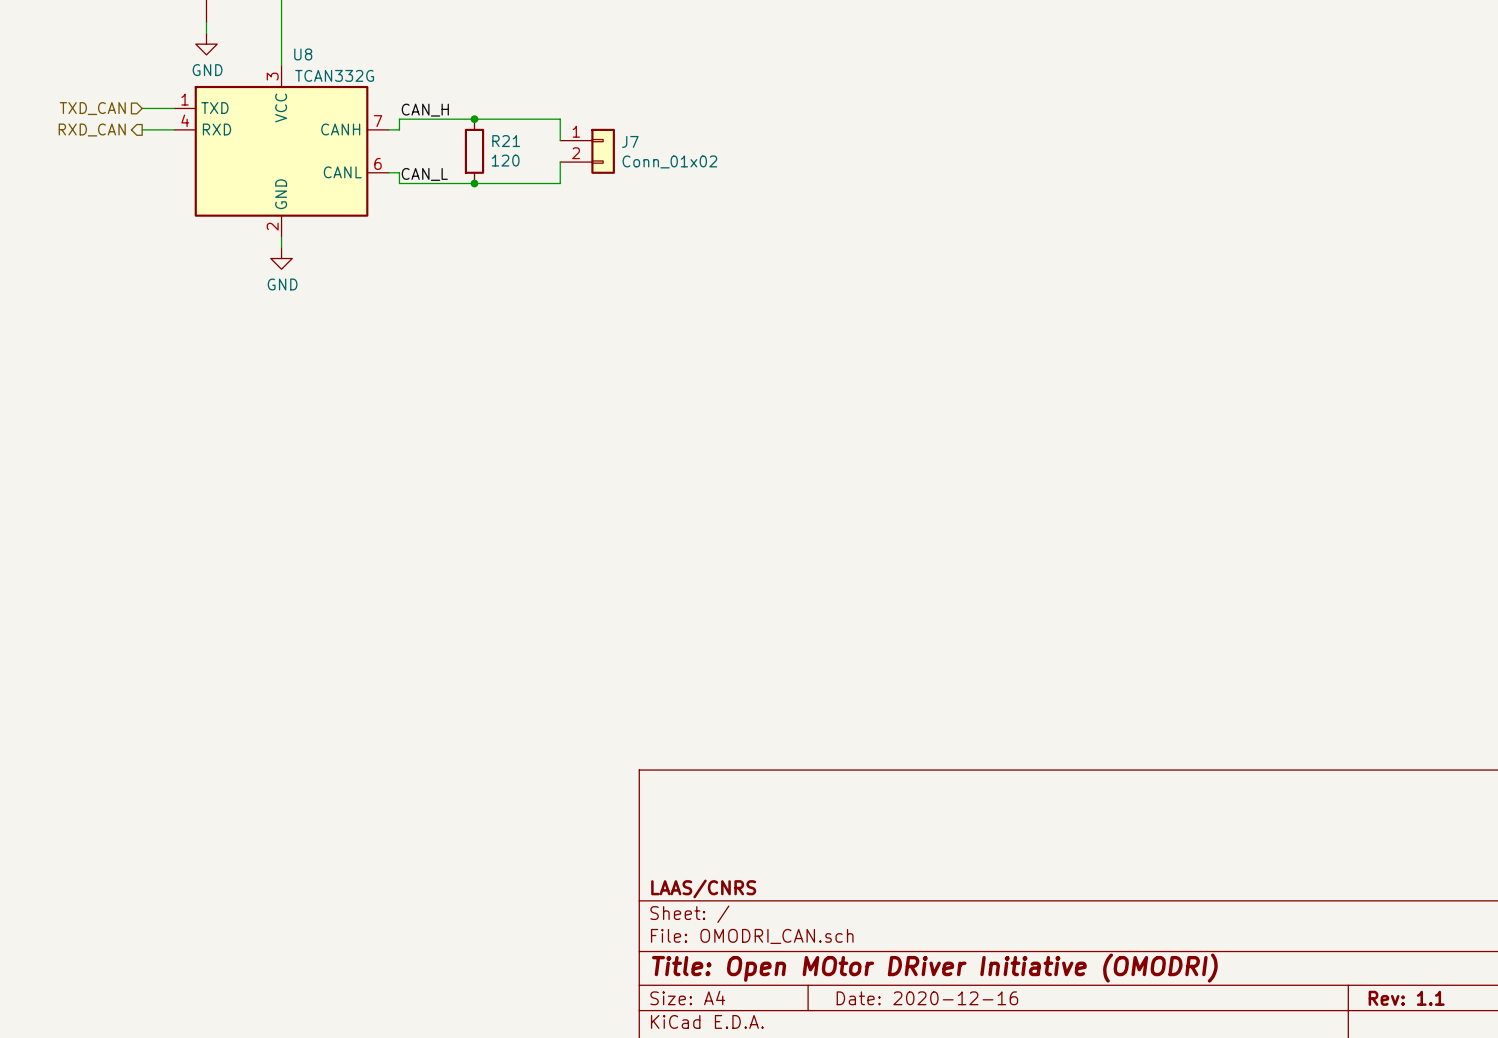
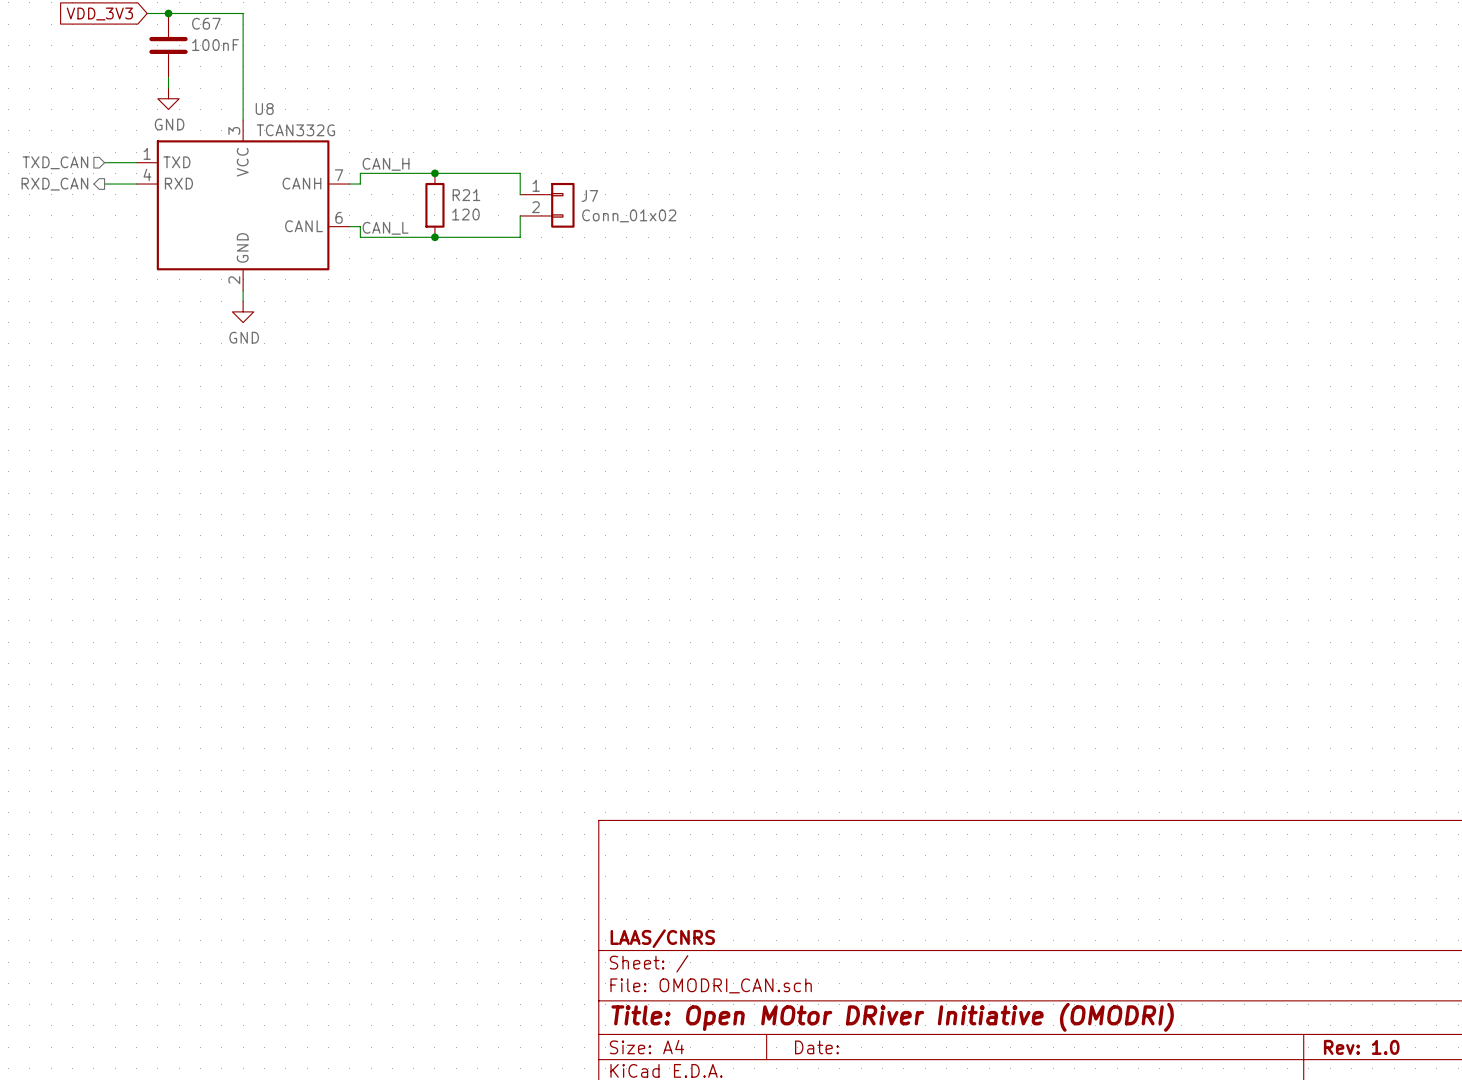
title block: Date: 2020-12-16 (927, 998) -> Date: (816, 1047)
title block: Rev: 1.1 (1406, 998) -> Rev: 1.0 (1361, 1047)

